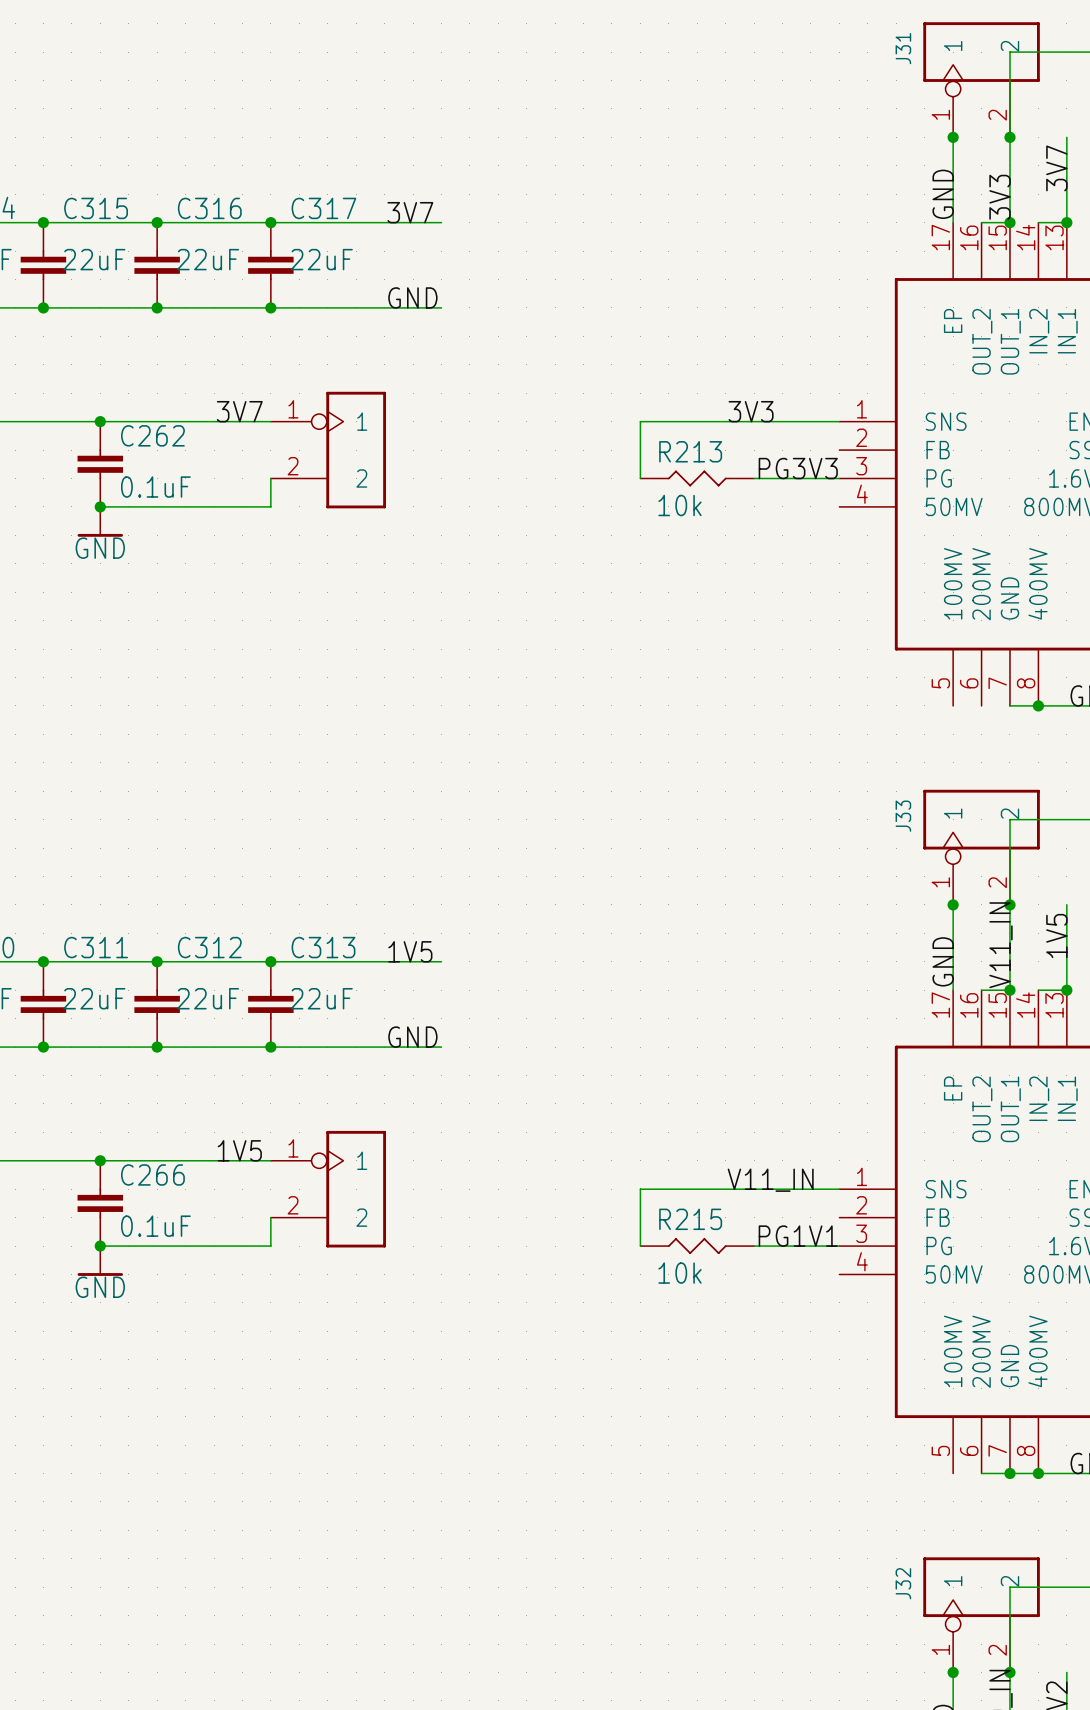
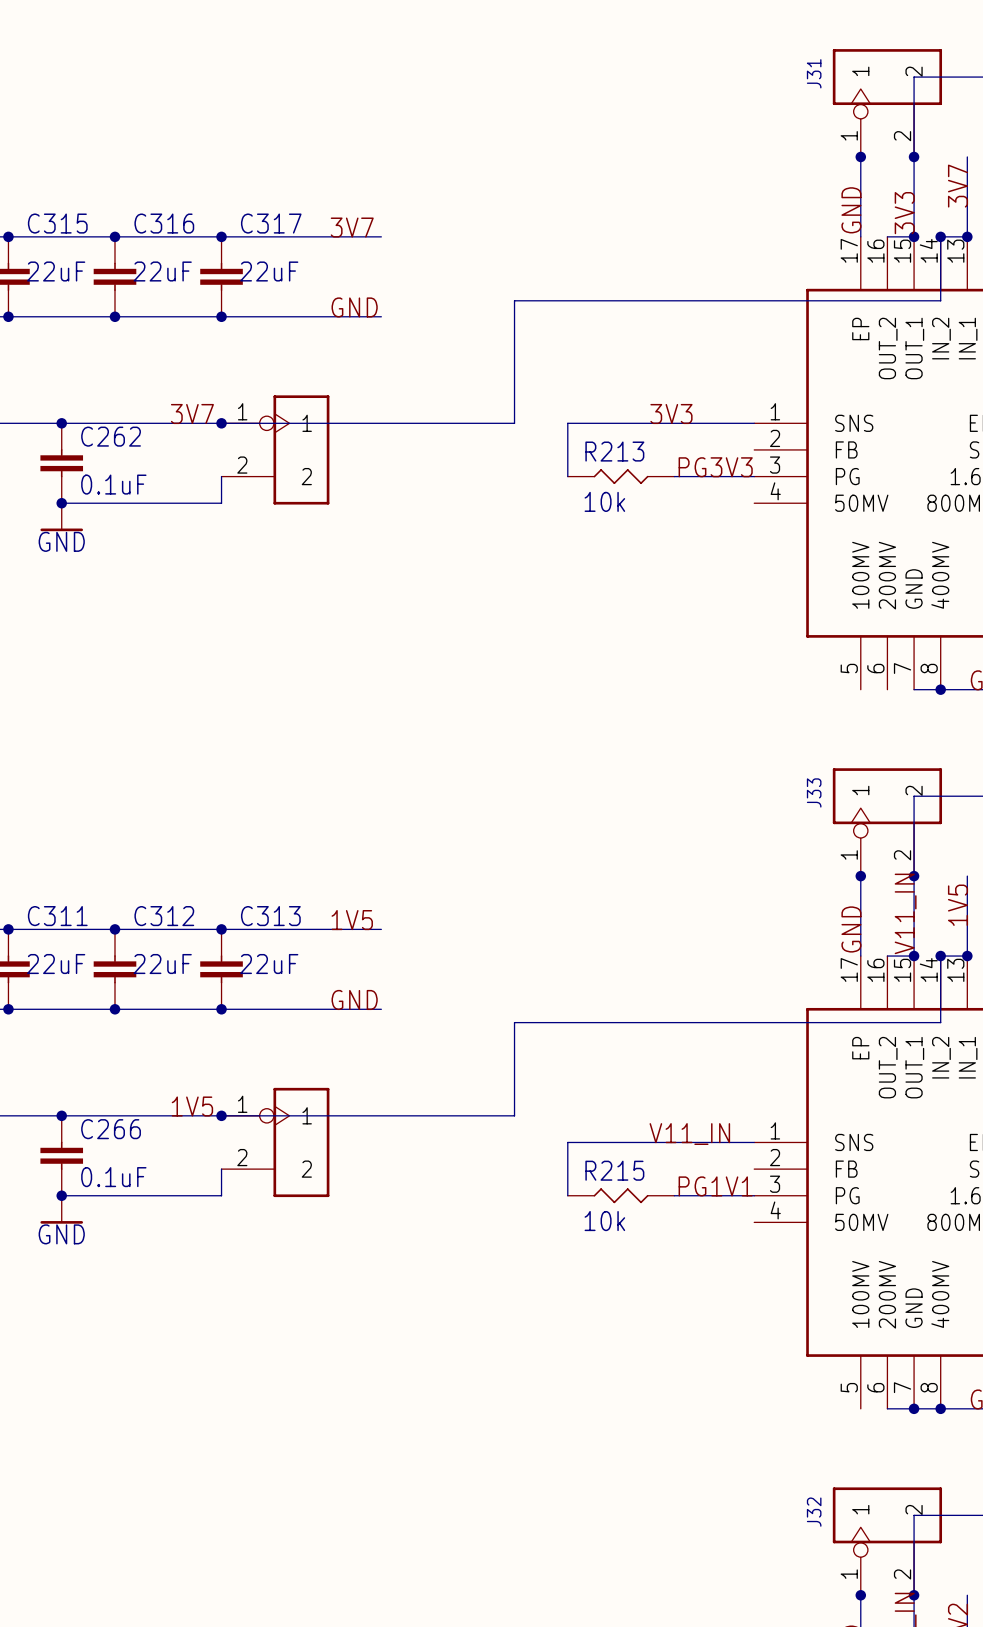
wire: none -> (940, 236) (940, 300) (514, 300) (514, 423) (221, 423)
junction: none -> (940, 236)
junction: none -> (221, 423)
wire: none -> (940, 956) (940, 1022) (514, 1022) (514, 1115) (221, 1115)
junction: none -> (940, 956)
junction: none -> (221, 1115)

